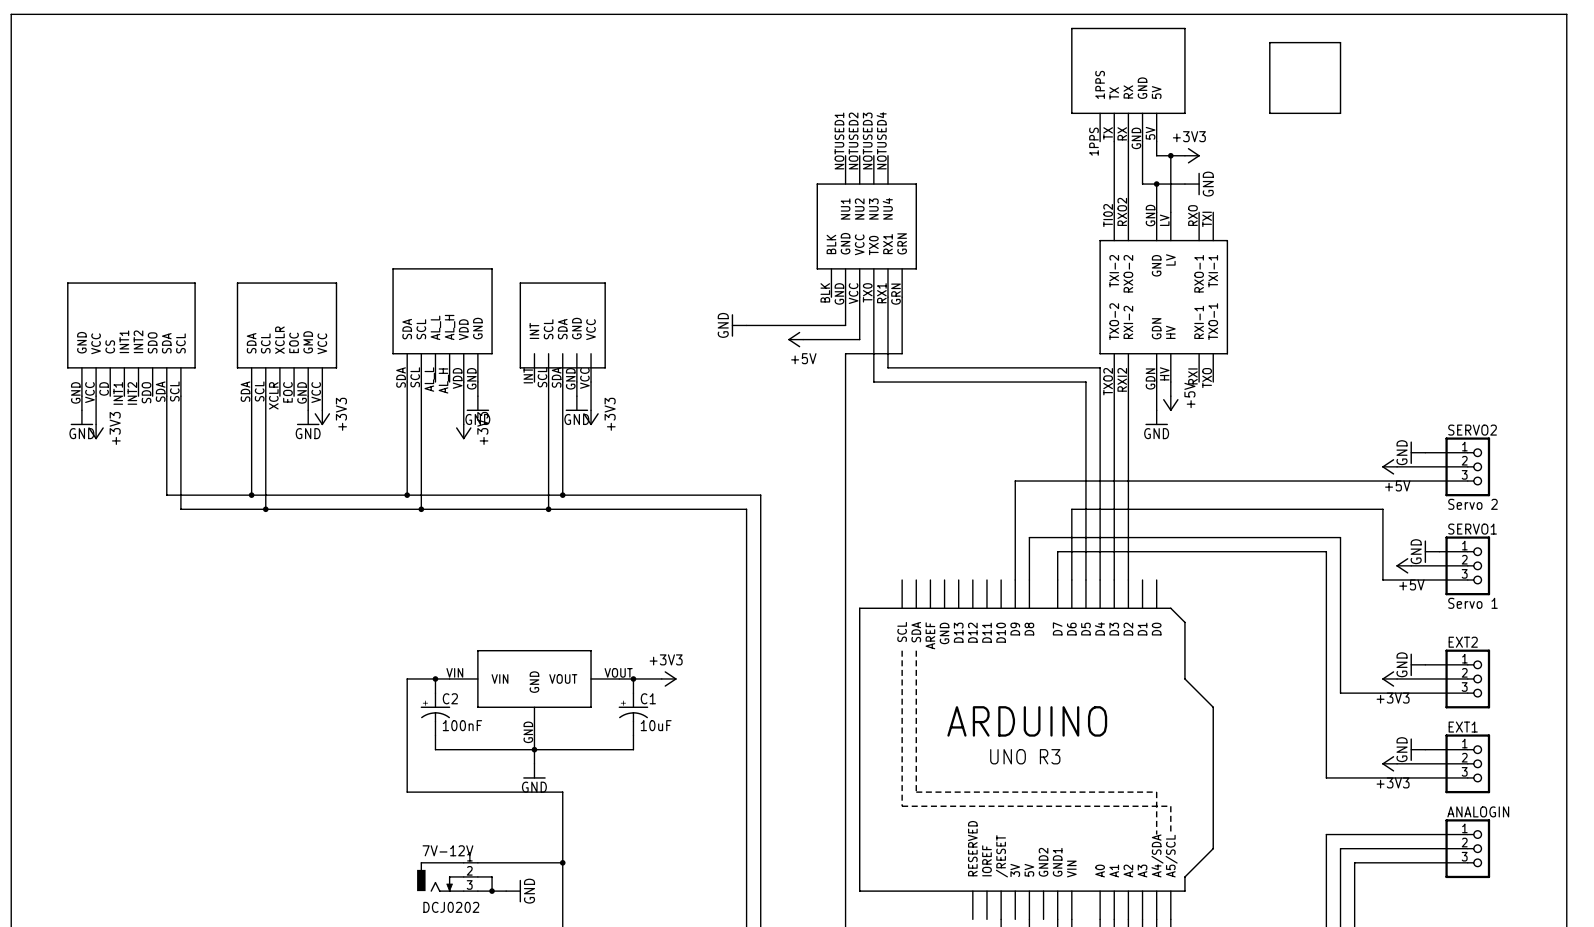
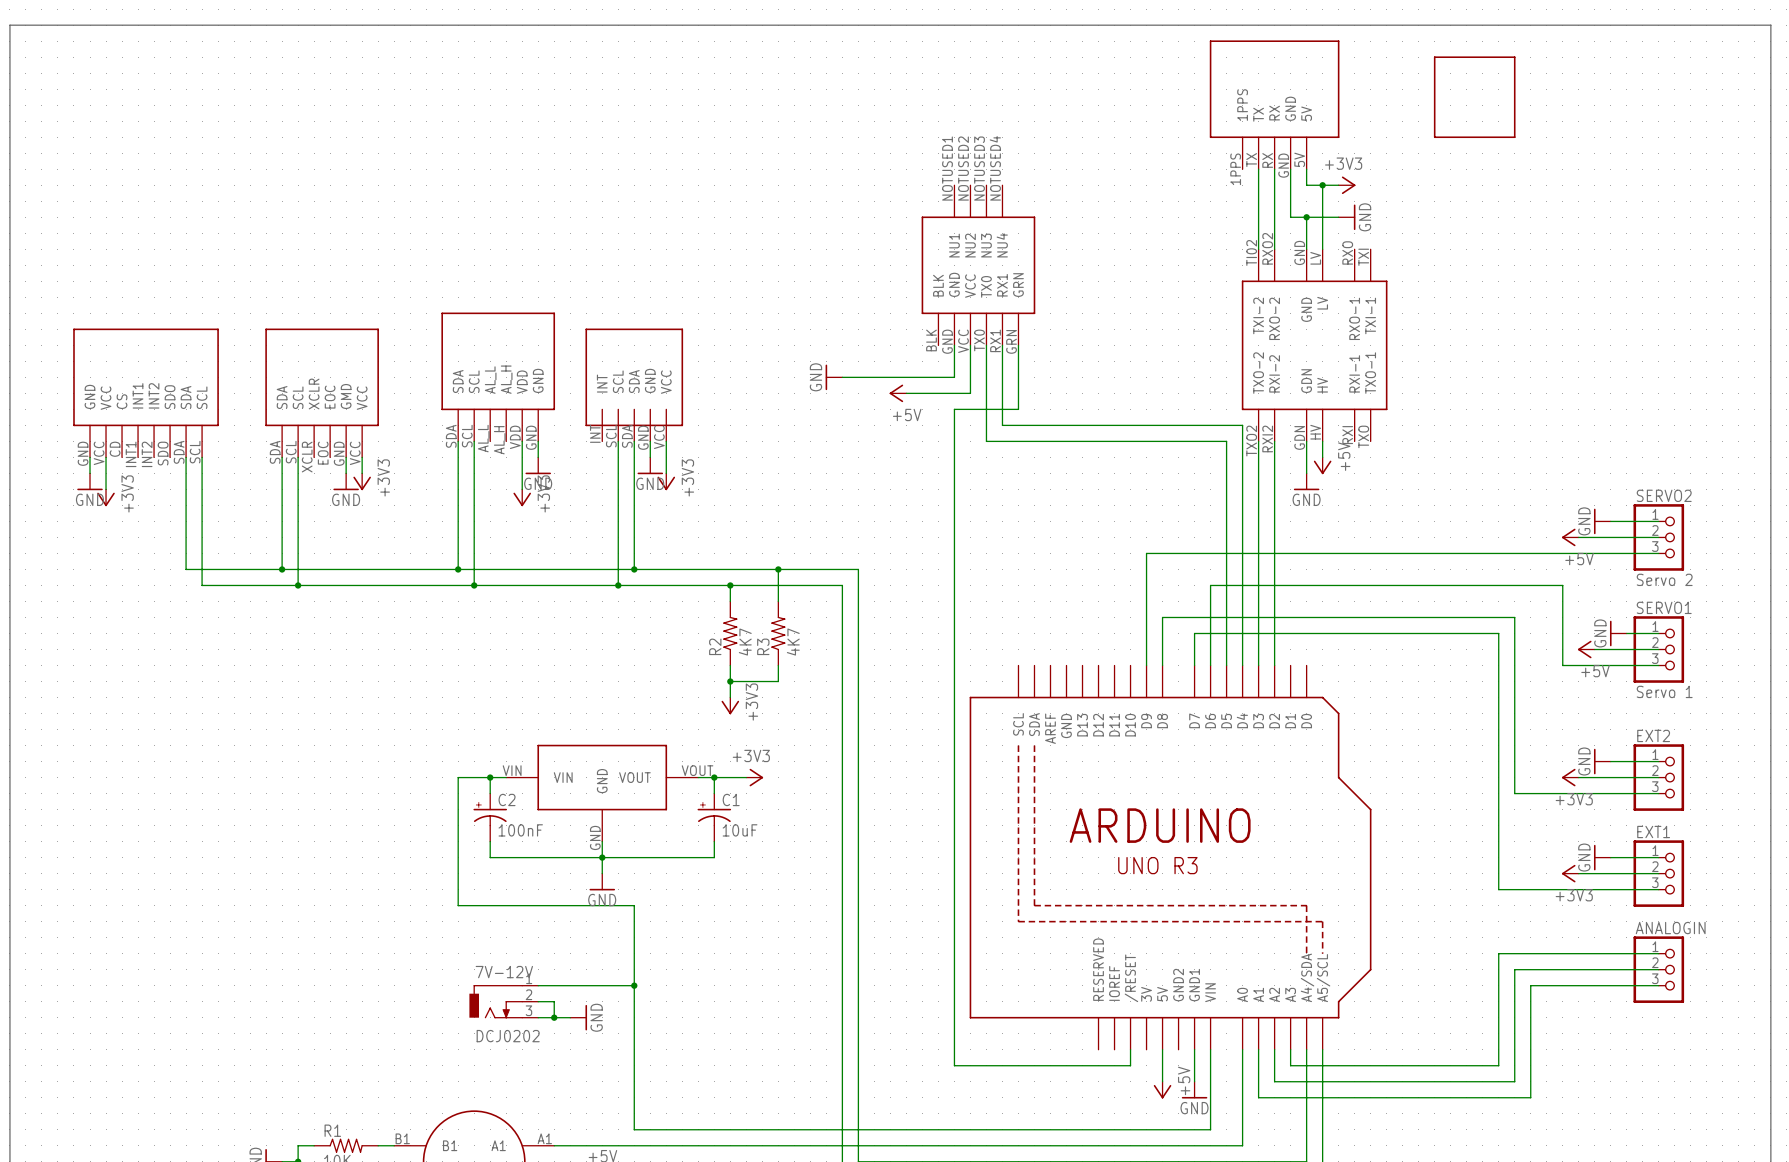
wire: none -> (778, 569) (778, 601)
junction: none -> (778, 569)
wire: none -> (730, 585) (730, 601)
junction: none -> (730, 585)
R2: none -> 4K7 (730, 633)
R3: none -> 4K7 (778, 633)
wire: none -> (730, 665) (730, 697)
wire: none -> (778, 665) (778, 681) (730, 681)
junction: none -> (730, 681)
power symbol: none -> +3V3 (730, 705)

